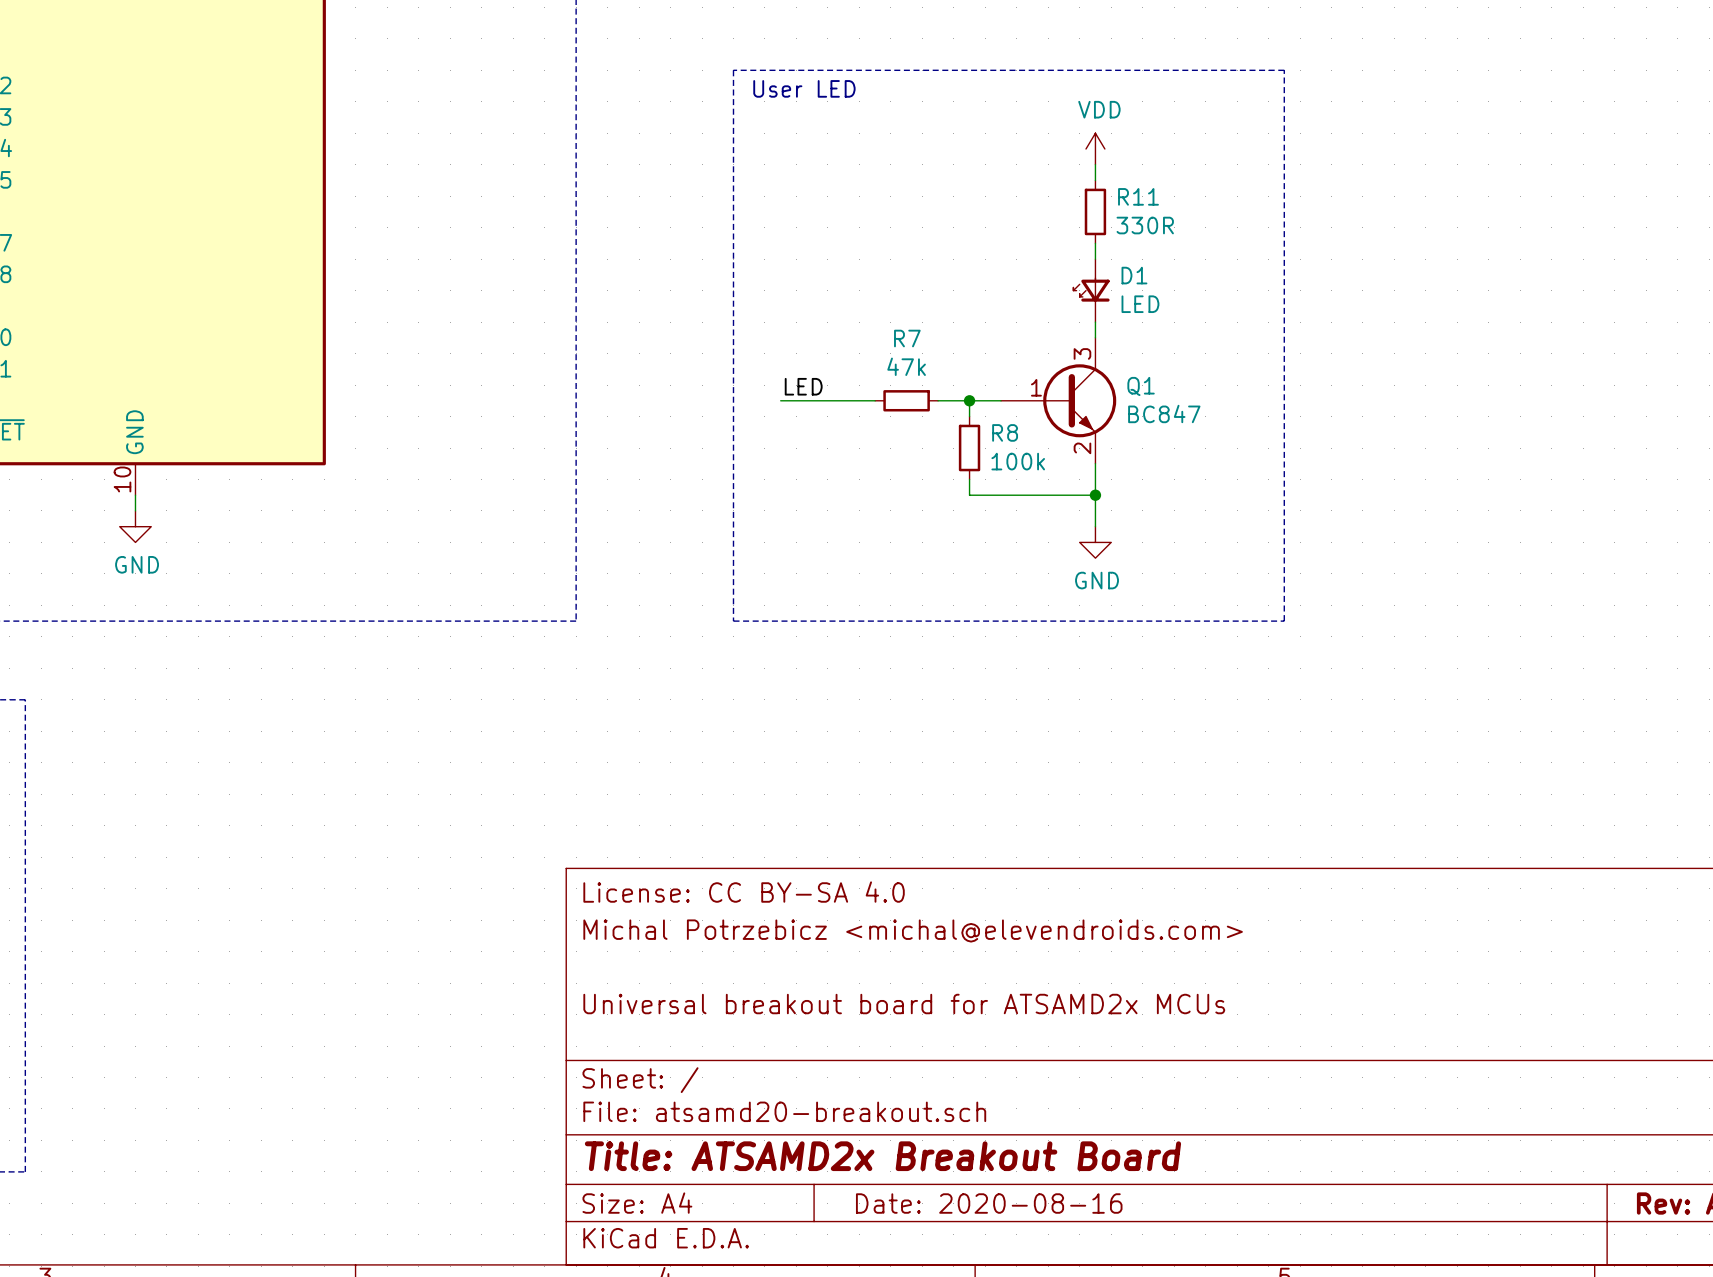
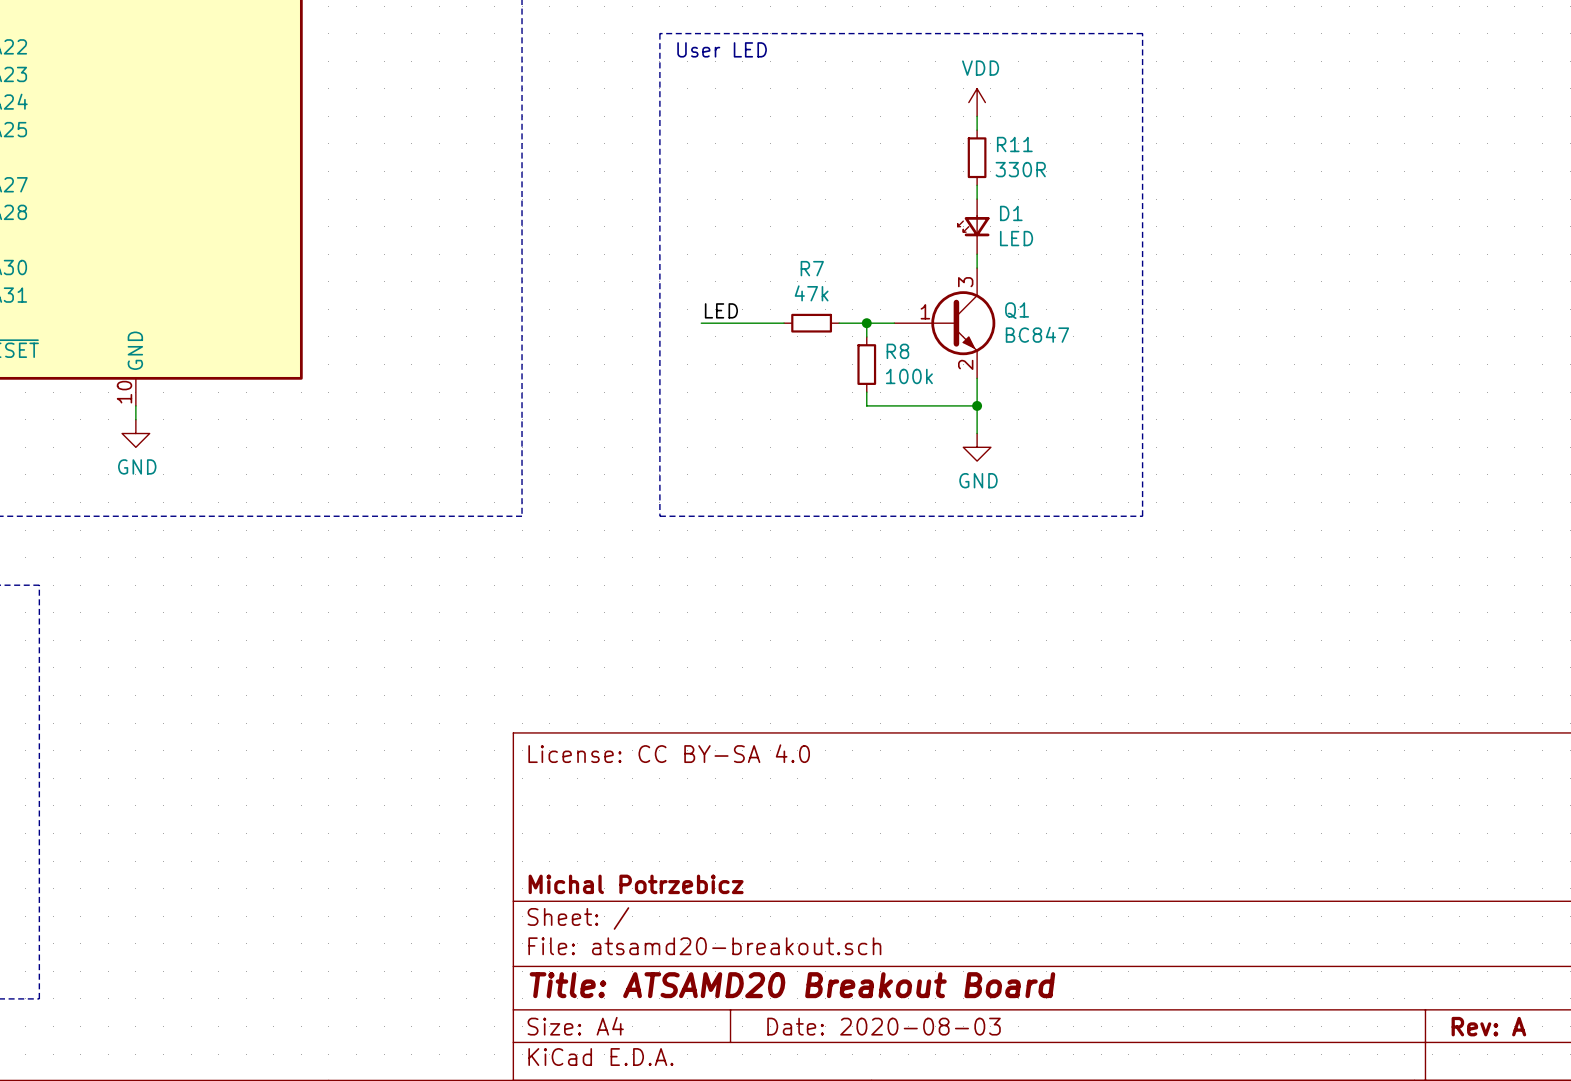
title block: Michal Potrzebicz <michal@elevendroids.com> (913, 930) -> none
title block: Universal breakout board for ATSAMD2x MCUs (904, 1004) -> none
title block: none -> Michal Potrzebicz (636, 884)
title block: Title: ATSAMD2x Breakout Board (882, 1156) -> Title: ATSAMD20 Breakout Board (792, 985)
title block: Date: 2020-08-16 (989, 1203) -> Date: 2020-08-03 (884, 1026)

